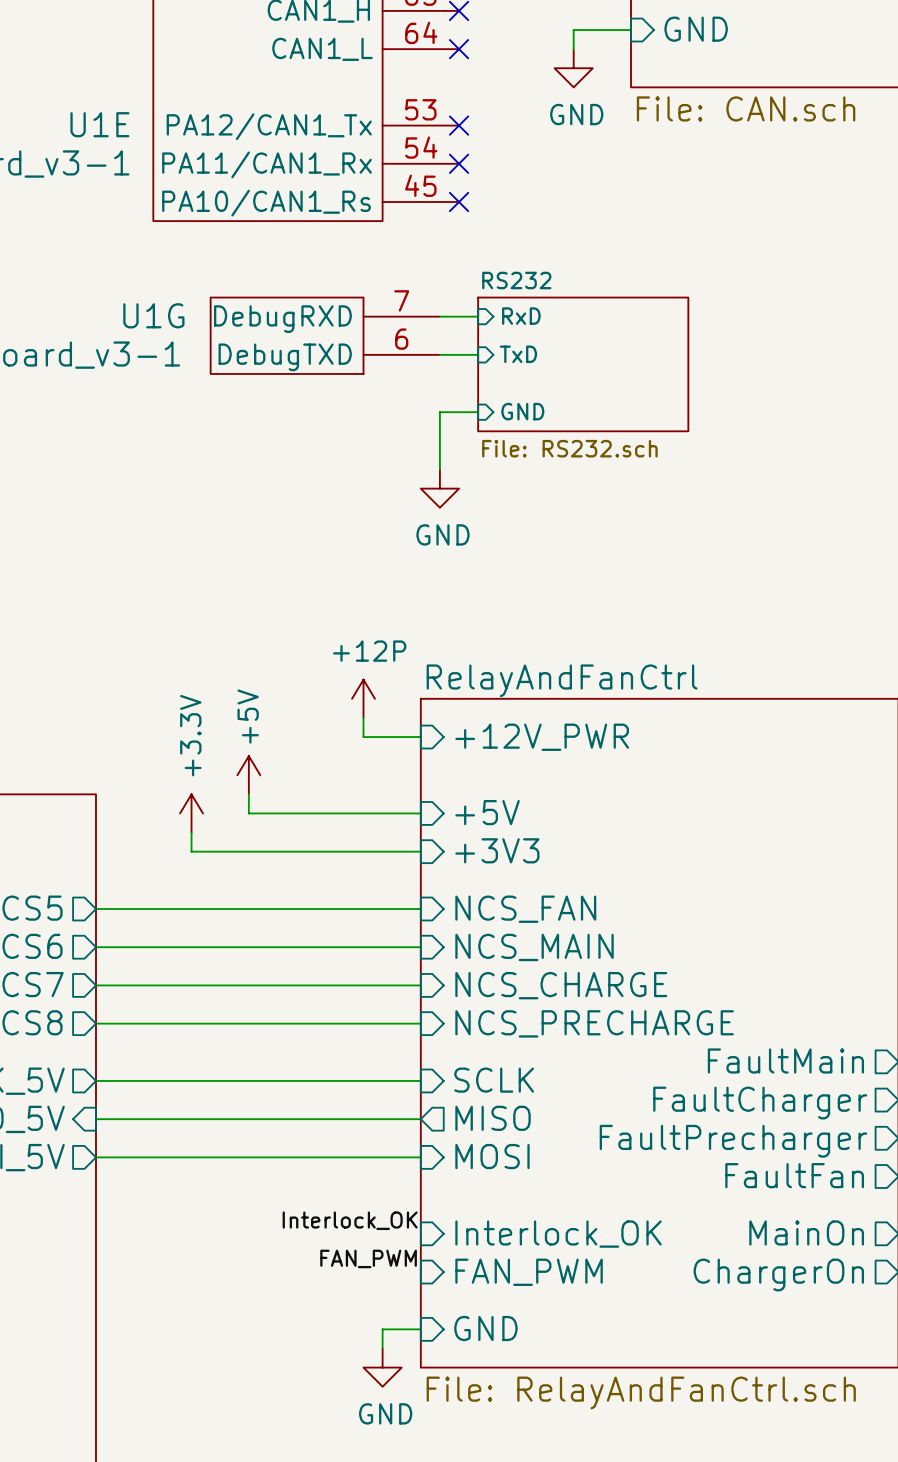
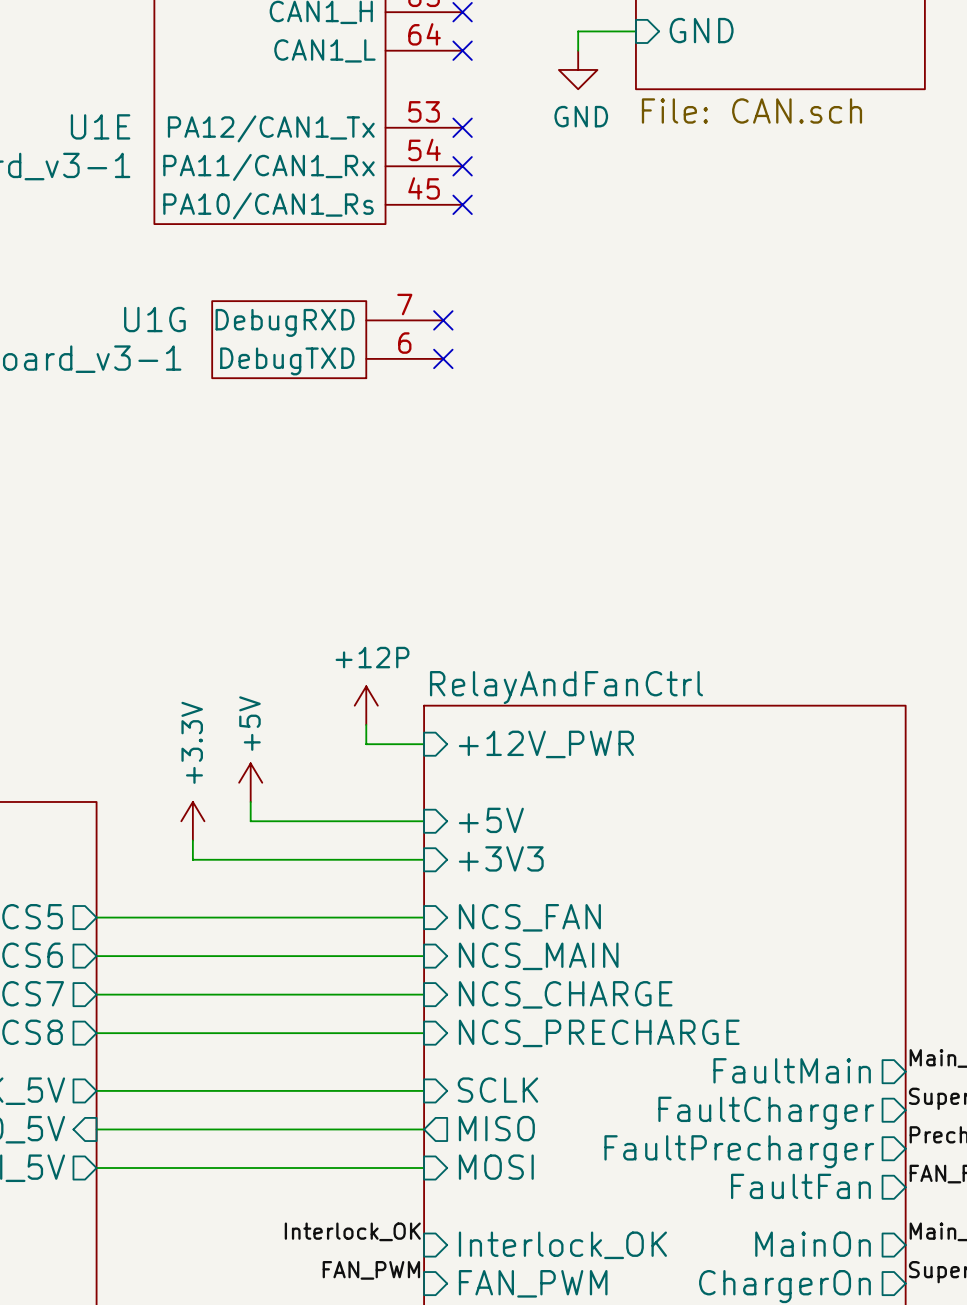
wire: (439, 316) (478, 316) -> none
no-connect mark: none -> (443, 320)
sheet pin: RxD (521, 316) -> none
wire: (439, 354) (478, 354) -> none
no-connect mark: none -> (443, 358)
sheet pin: TxD (518, 354) -> none
sheet RS232: File: RS232.sch (583, 364) -> none
sheet pin: GND (522, 411) -> none
wire: (478, 412) (439, 412) (439, 469) -> none
power symbol: GND (439, 488) -> none

